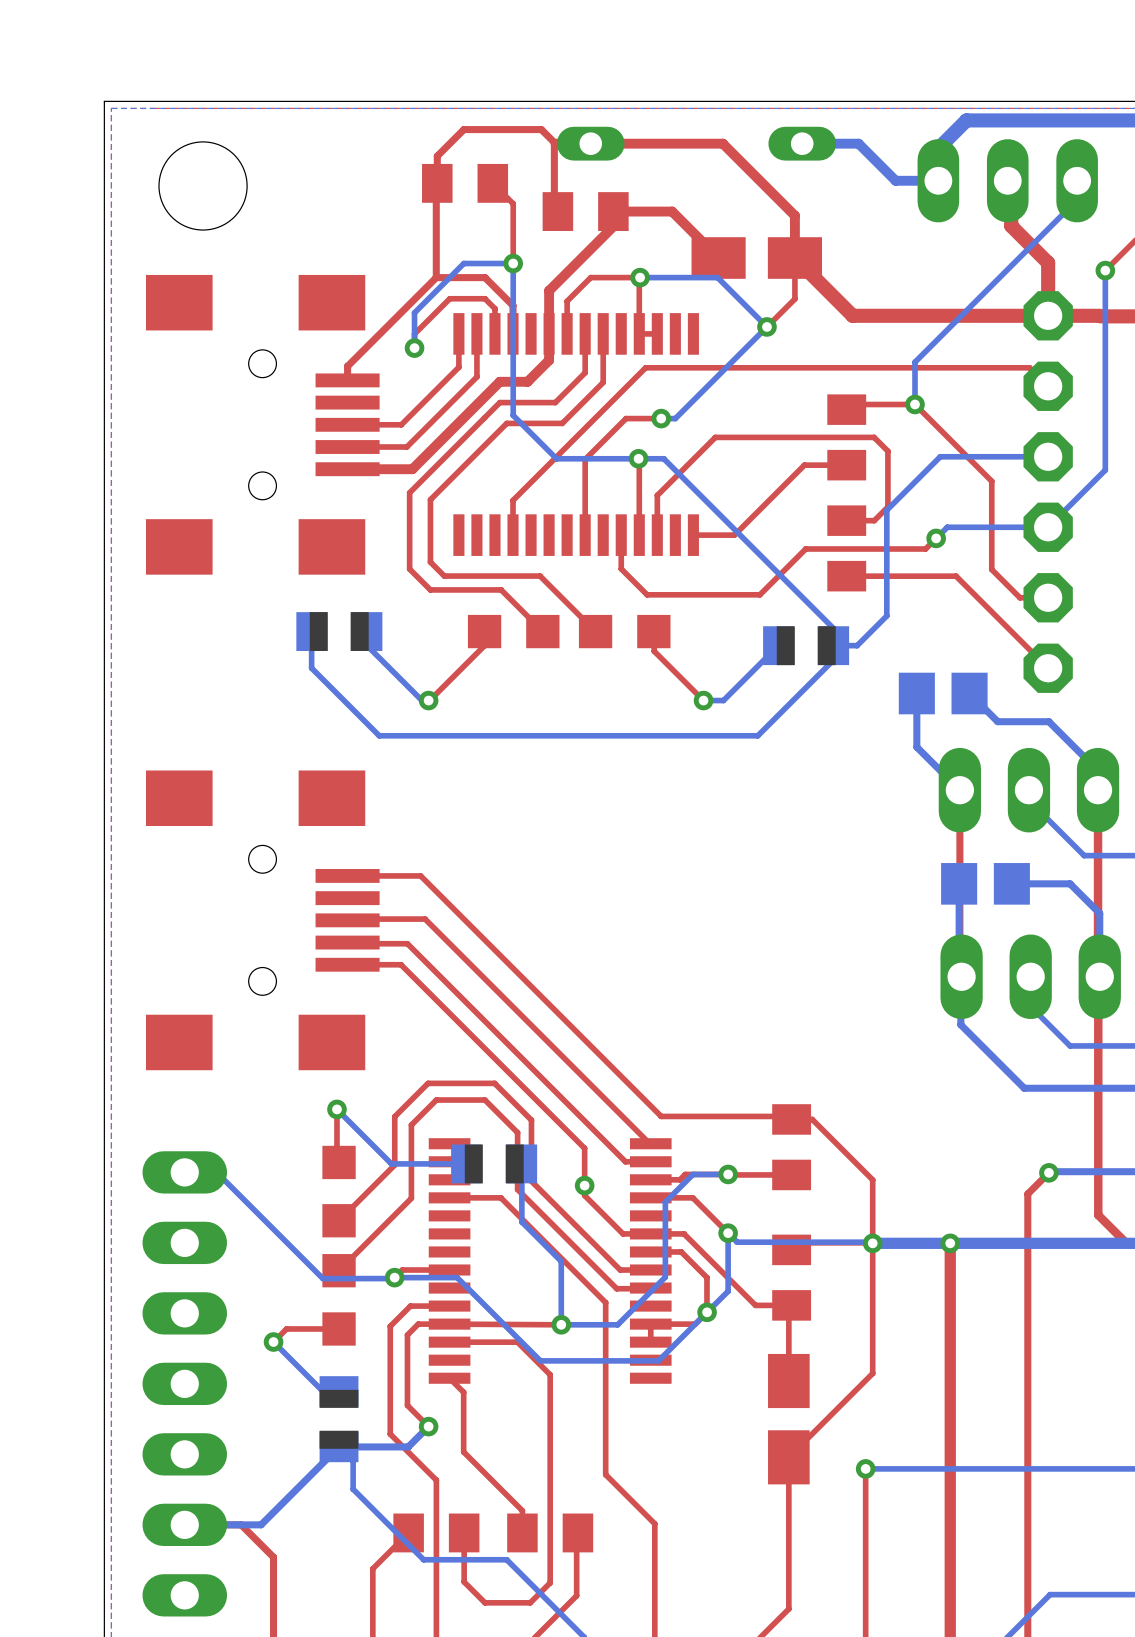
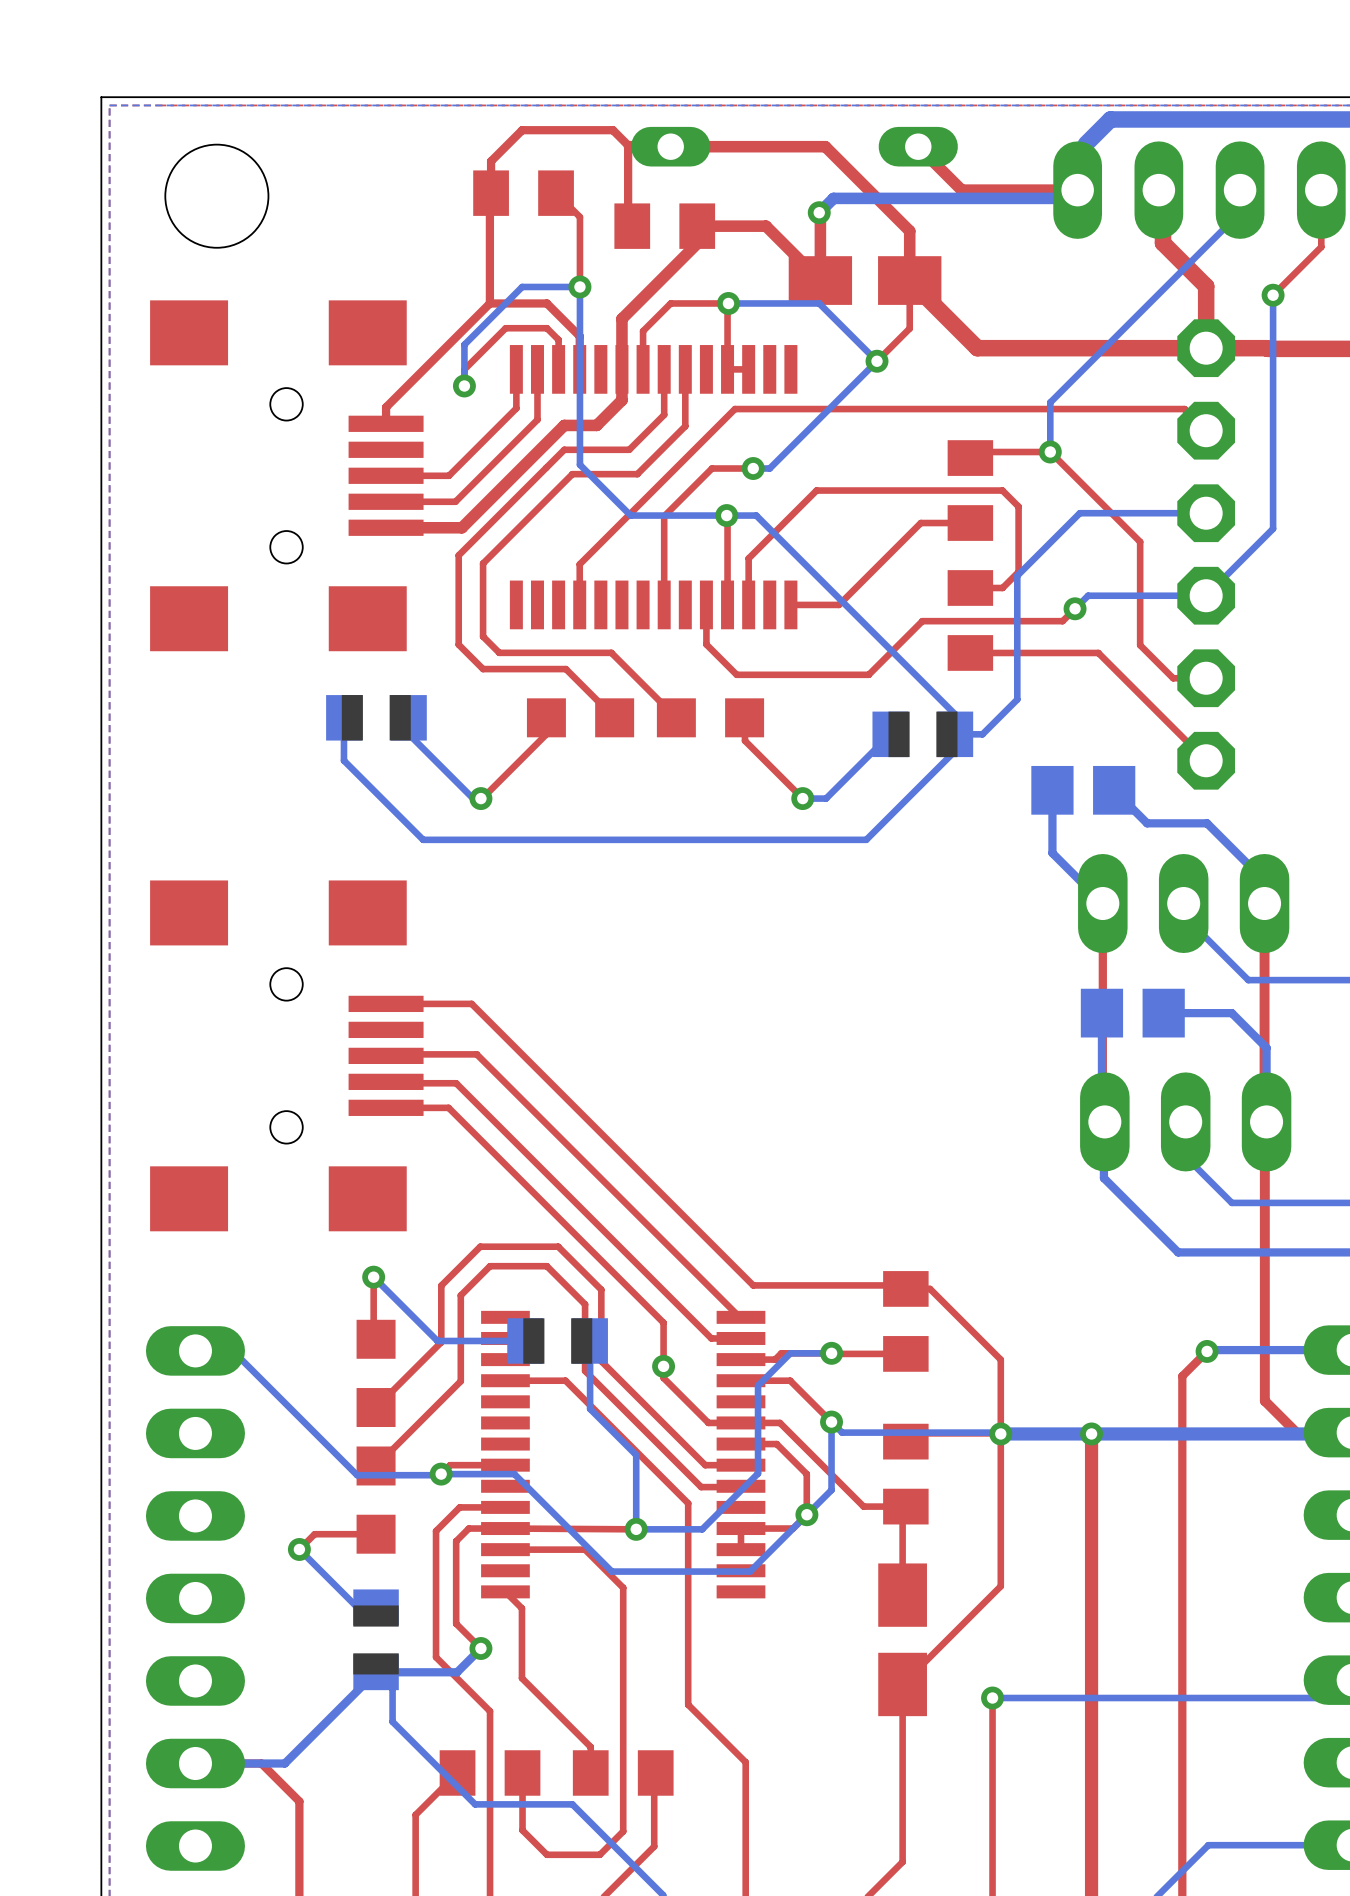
bottom track: (945, 141) (938, 148) (938, 180) (895, 180) (858, 143) (802, 143) -> (1085, 144) (1085, 181) (1069, 198) (833, 198) (819, 212)
top track: none -> (918, 146) (961, 190) (1077, 190)
top track: none -> (819, 212) (820, 280)
via: none -> (819, 212)

